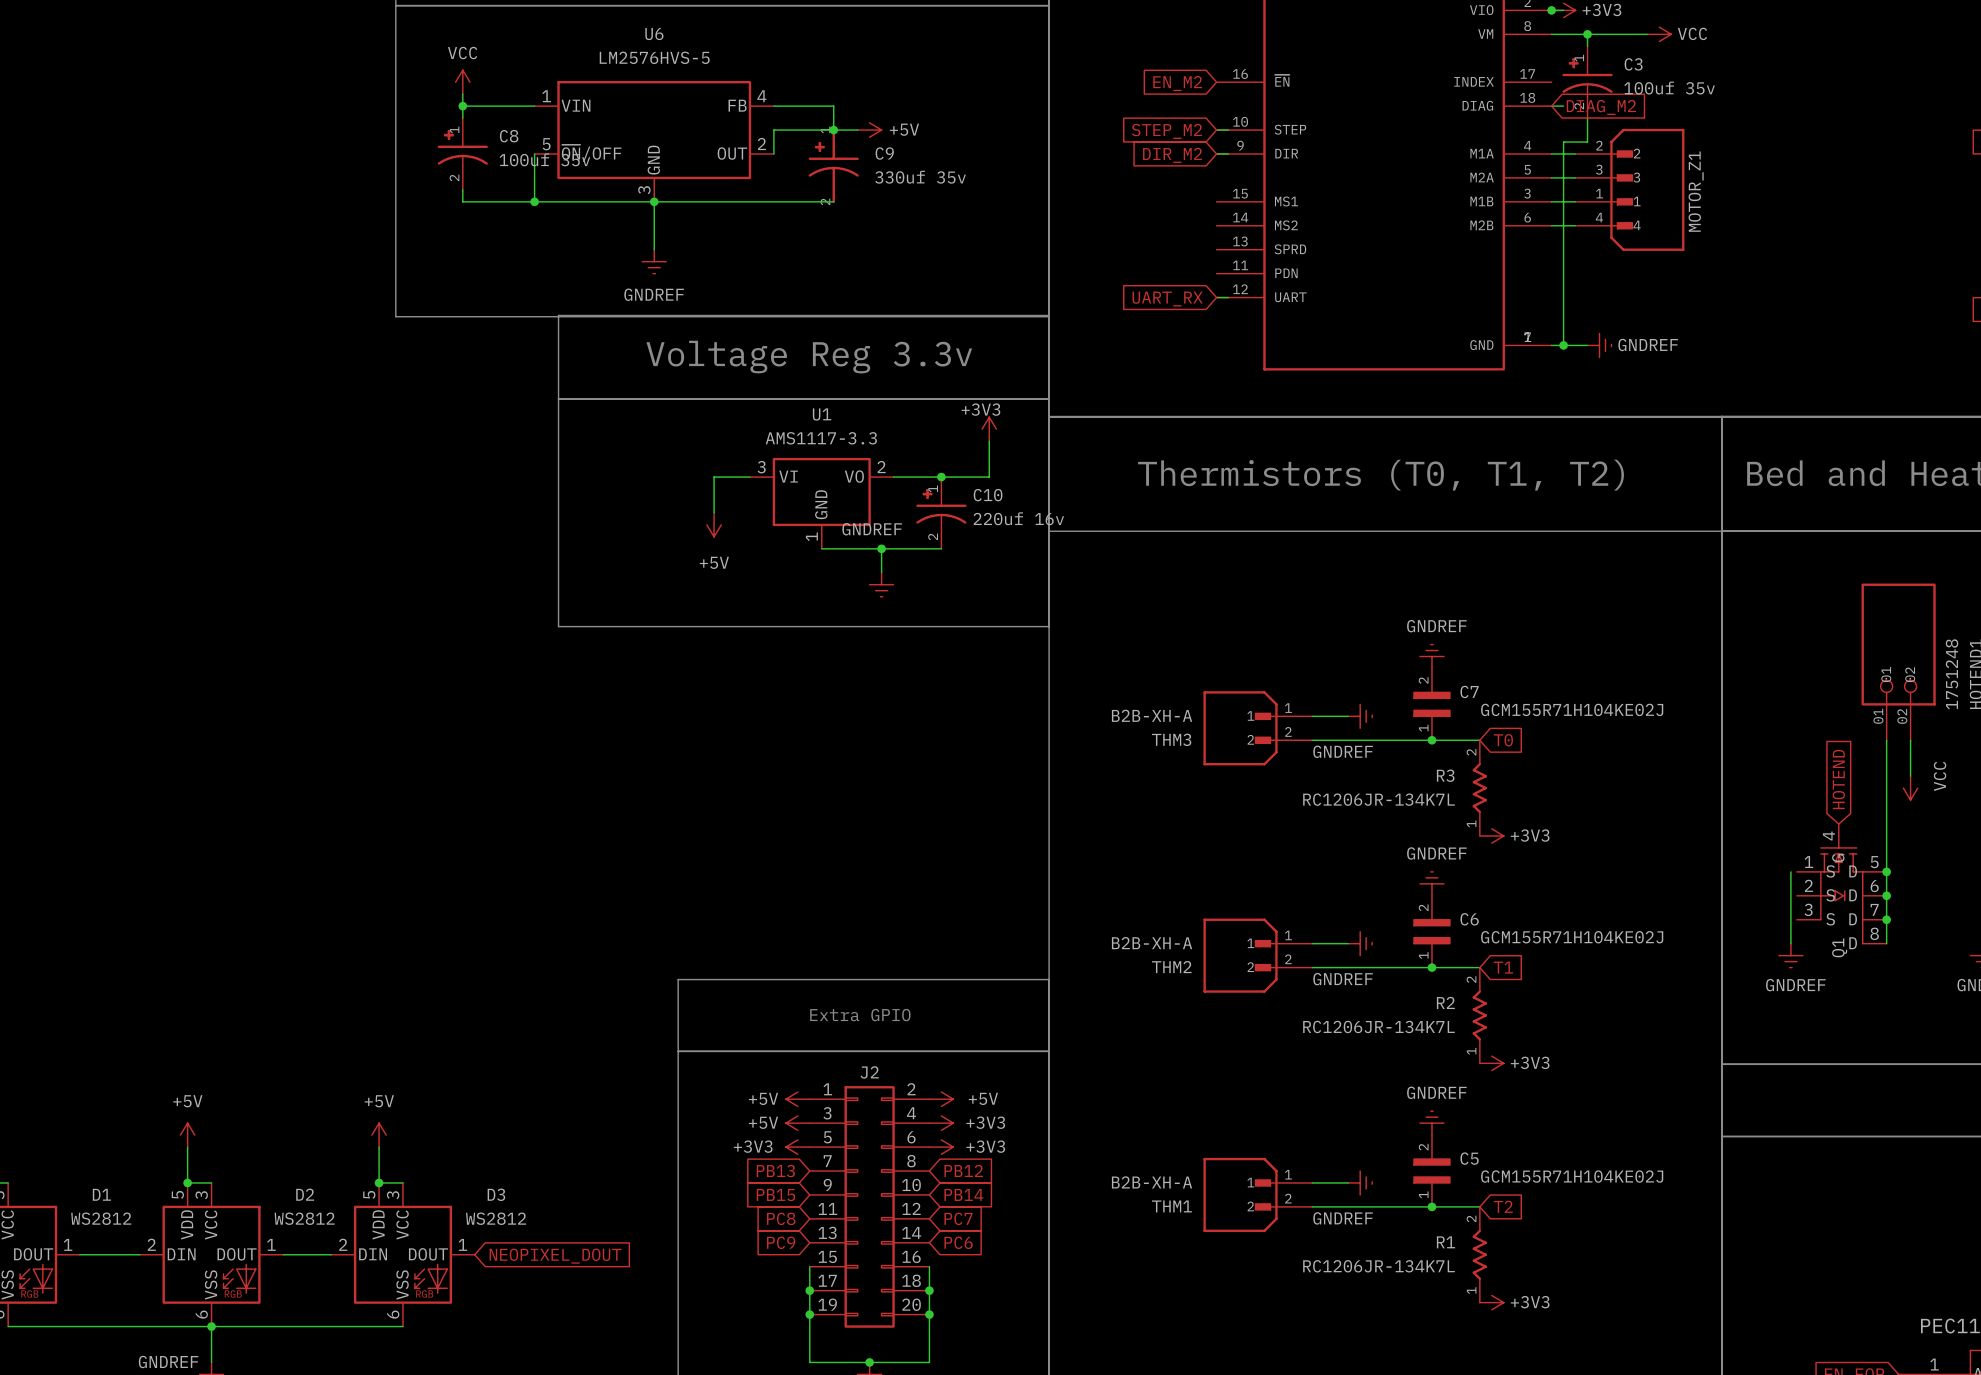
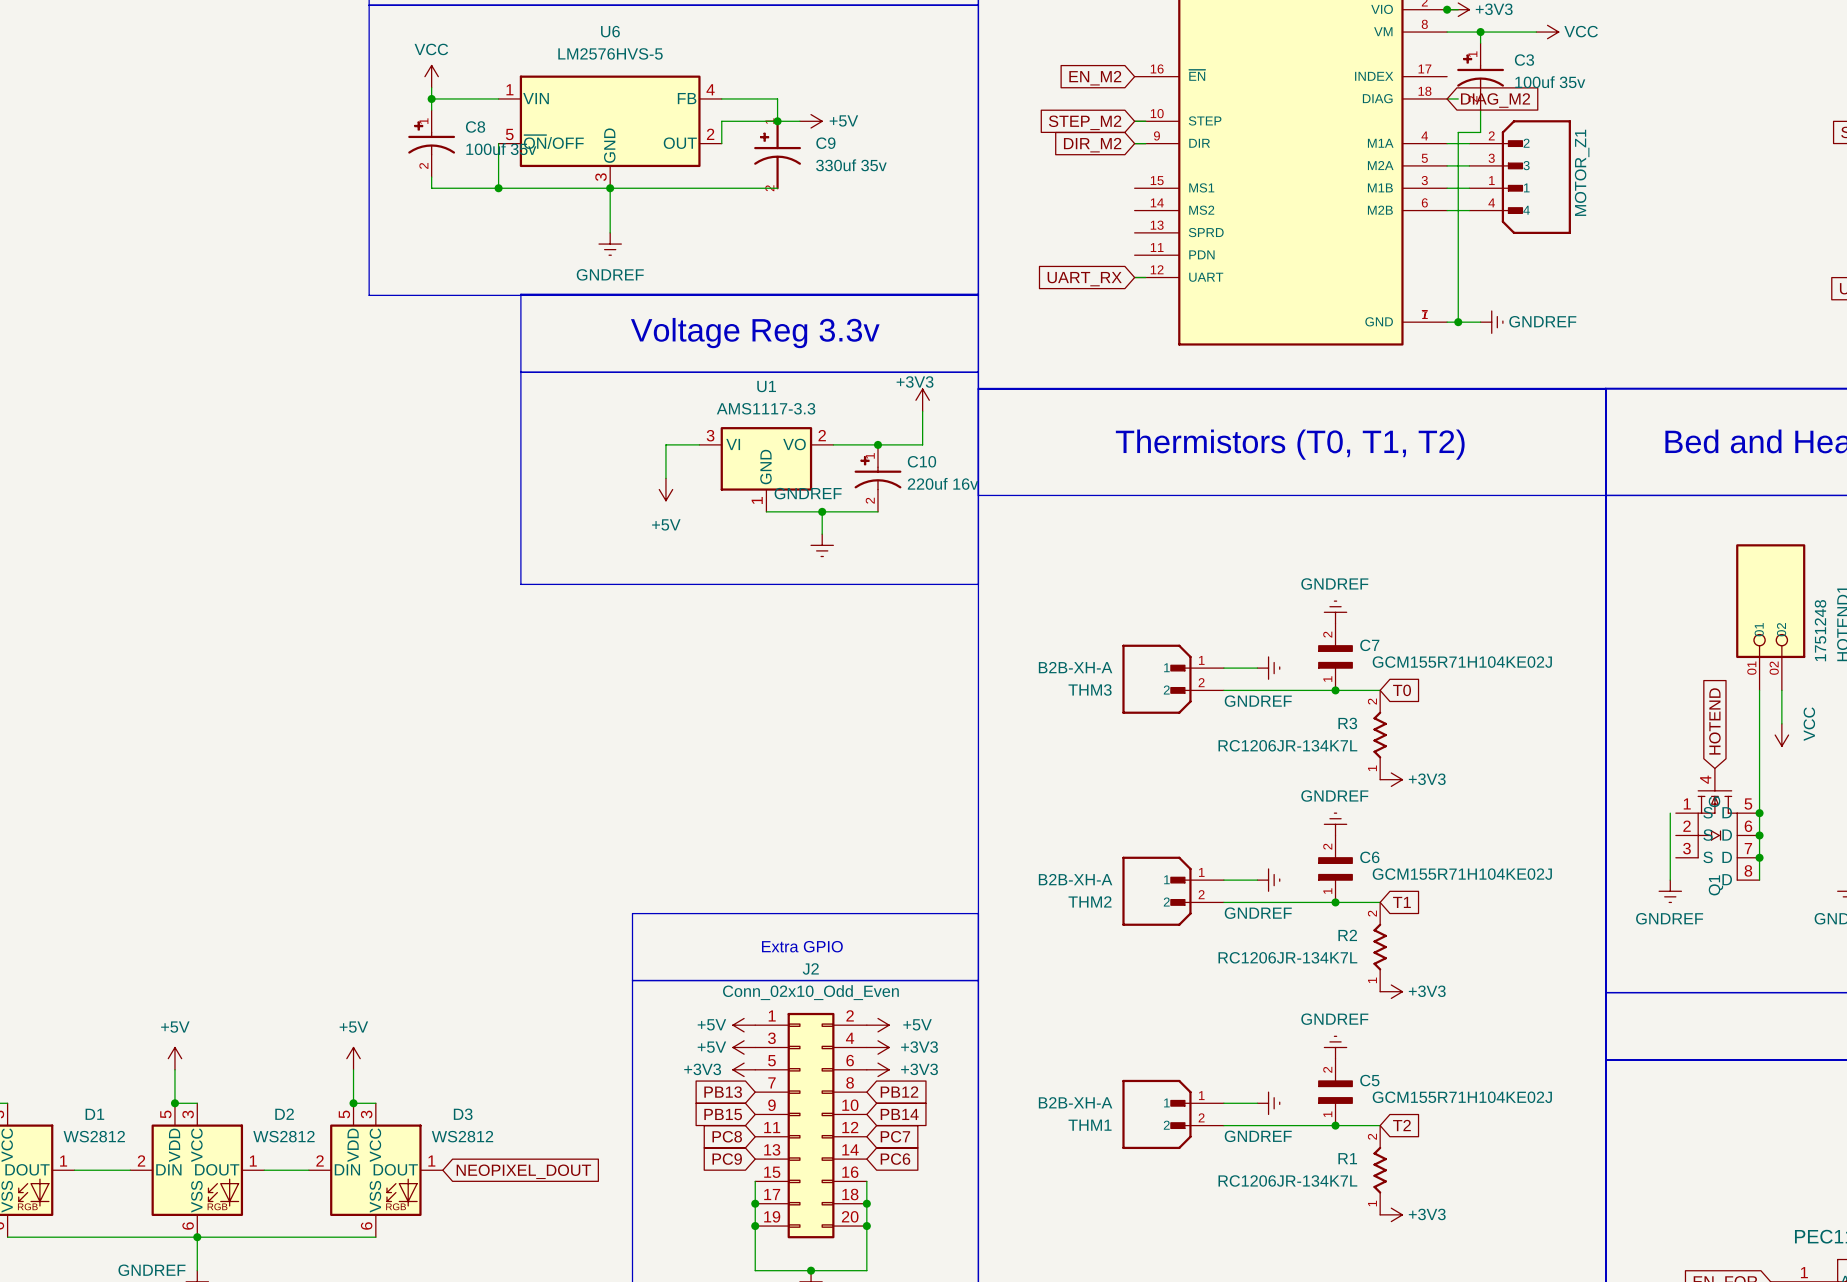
J2 value: none -> Conn_02x10_Odd_Even (810, 992)
J2 name position: J2 (869, 1072) -> J2 (810, 968)

